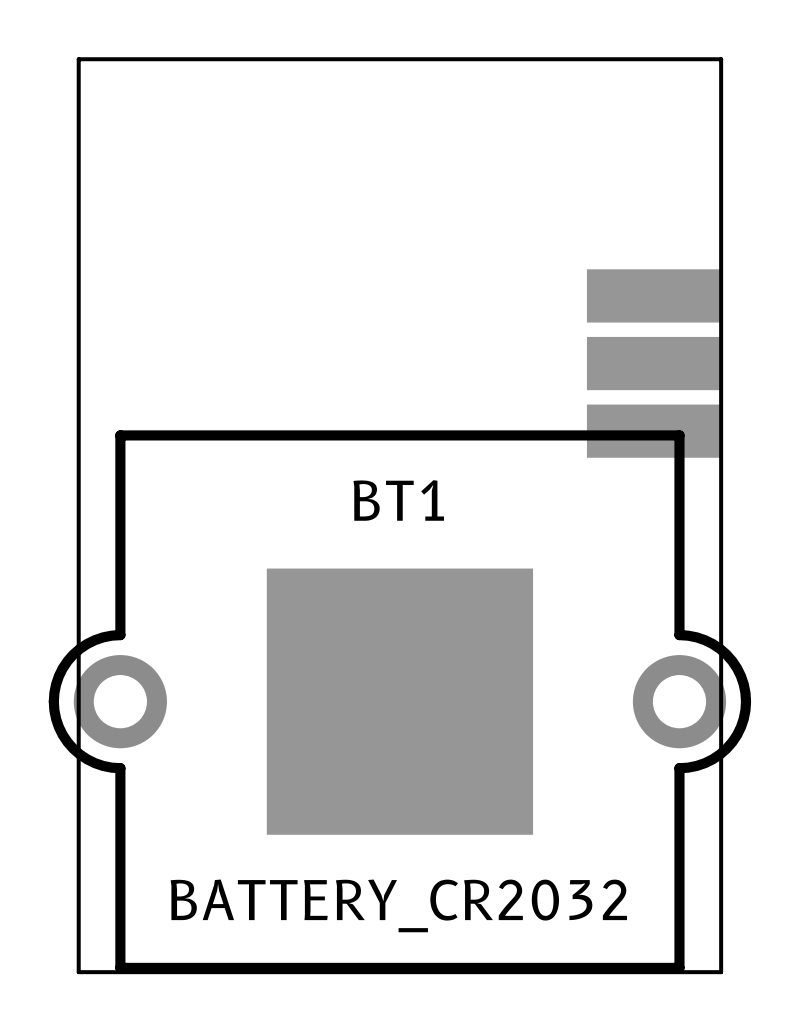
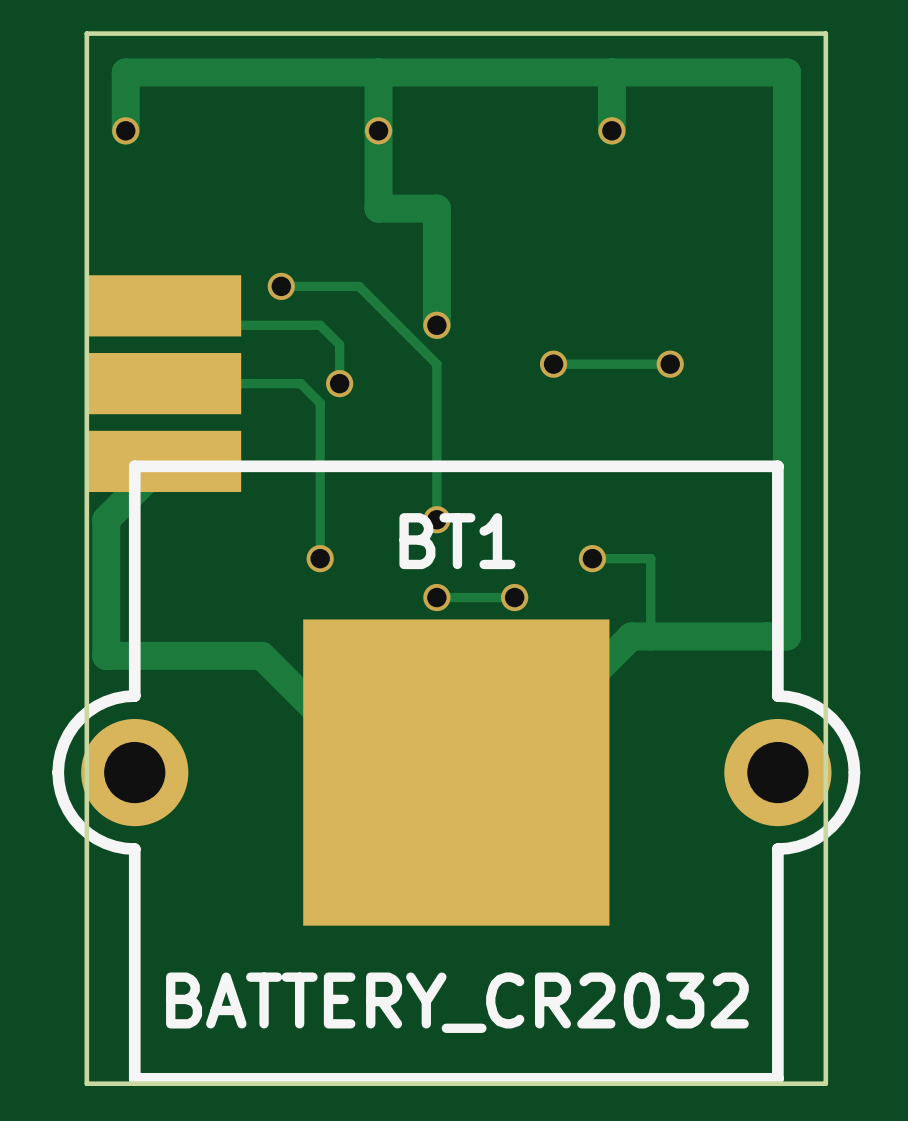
track: none -> (378, 72) (378, 208) (436, 208) (436, 325)
track: none -> (611, 72) (611, 130)
track: none -> (125, 130) (125, 72) (786, 72) (786, 636) (631, 636) (495, 772) (378, 772) (261, 655) (106, 655) (106, 519) (164, 461)
via: none -> (125, 130)
via: none -> (378, 130)
via: none -> (611, 130)
track: none -> (281, 286) (359, 286) (436, 364) (436, 519)
via: none -> (281, 286)
track: none -> (164, 305) (184, 325) (320, 325) (339, 344) (339, 383)
via: none -> (436, 325)
via: none -> (553, 364)
track: none -> (670, 364) (553, 364)
via: none -> (670, 364)
track: none -> (164, 383) (300, 383) (320, 403) (320, 558)
via: none -> (339, 383)
part position: (653, 363) -> (164, 383)
via: none -> (436, 519)
via: none -> (320, 558)
track: none -> (592, 558) (650, 558) (650, 636)
via: none -> (592, 558)
via: none -> (436, 597)
track: none -> (514, 597) (436, 597)
via: none -> (514, 597)

